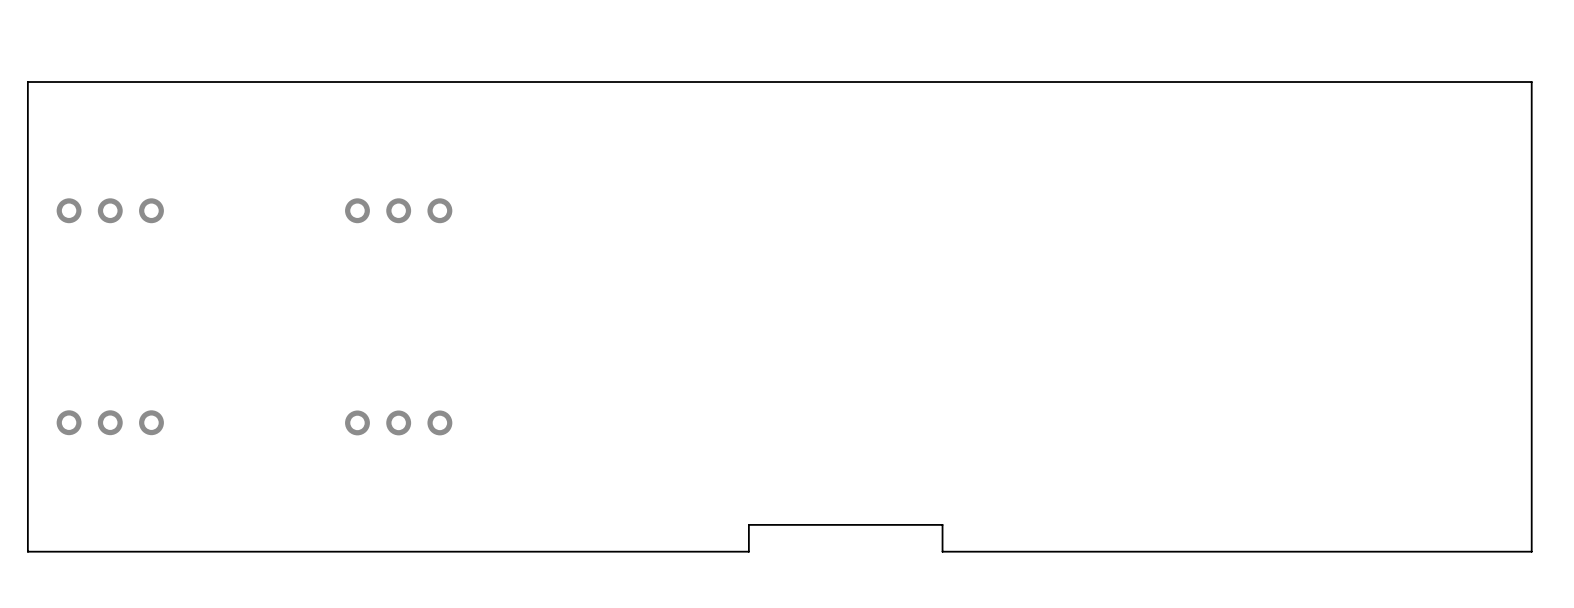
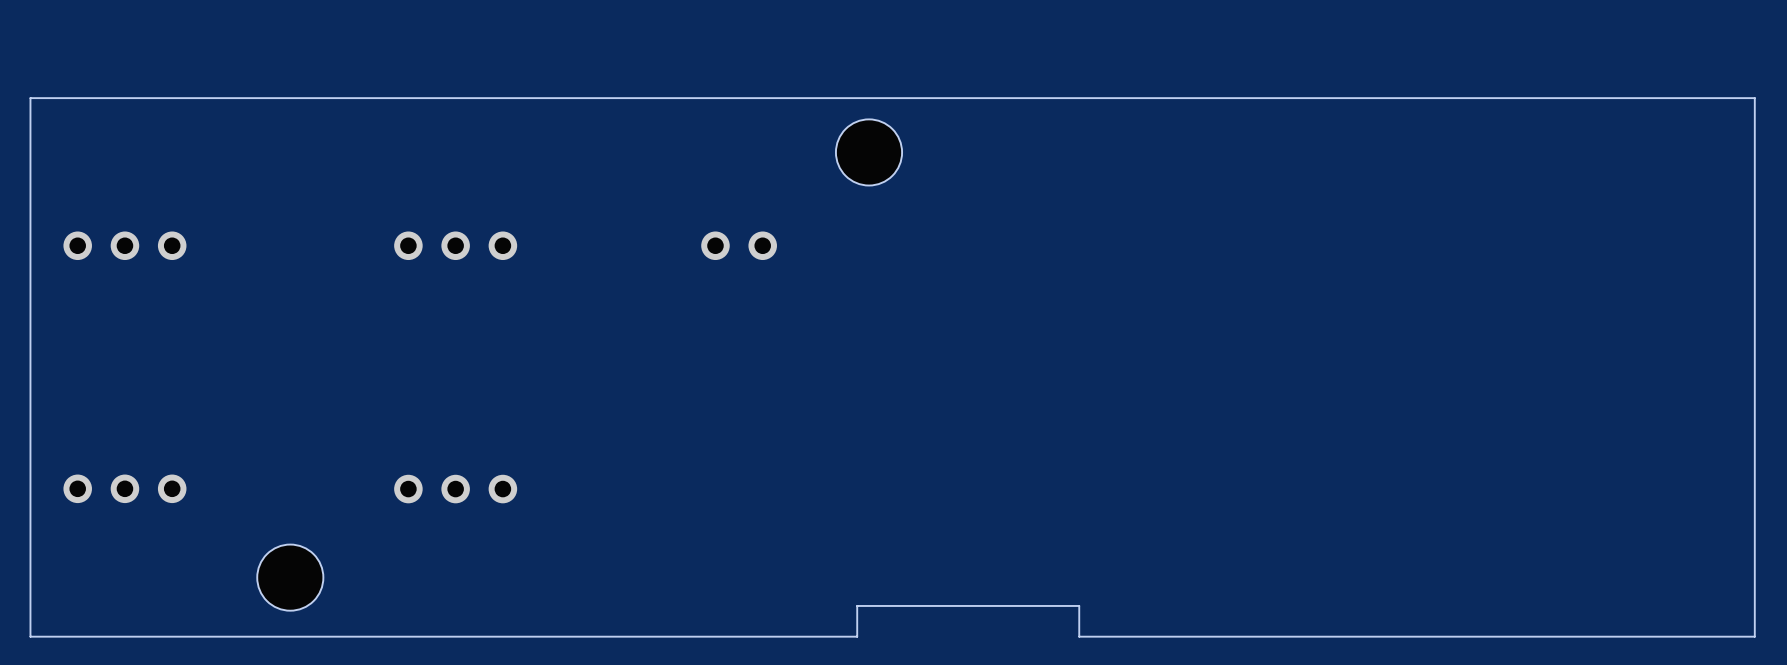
hole: none -> (869, 152)
part: none -> (739, 245)
hole: none -> (290, 577)

